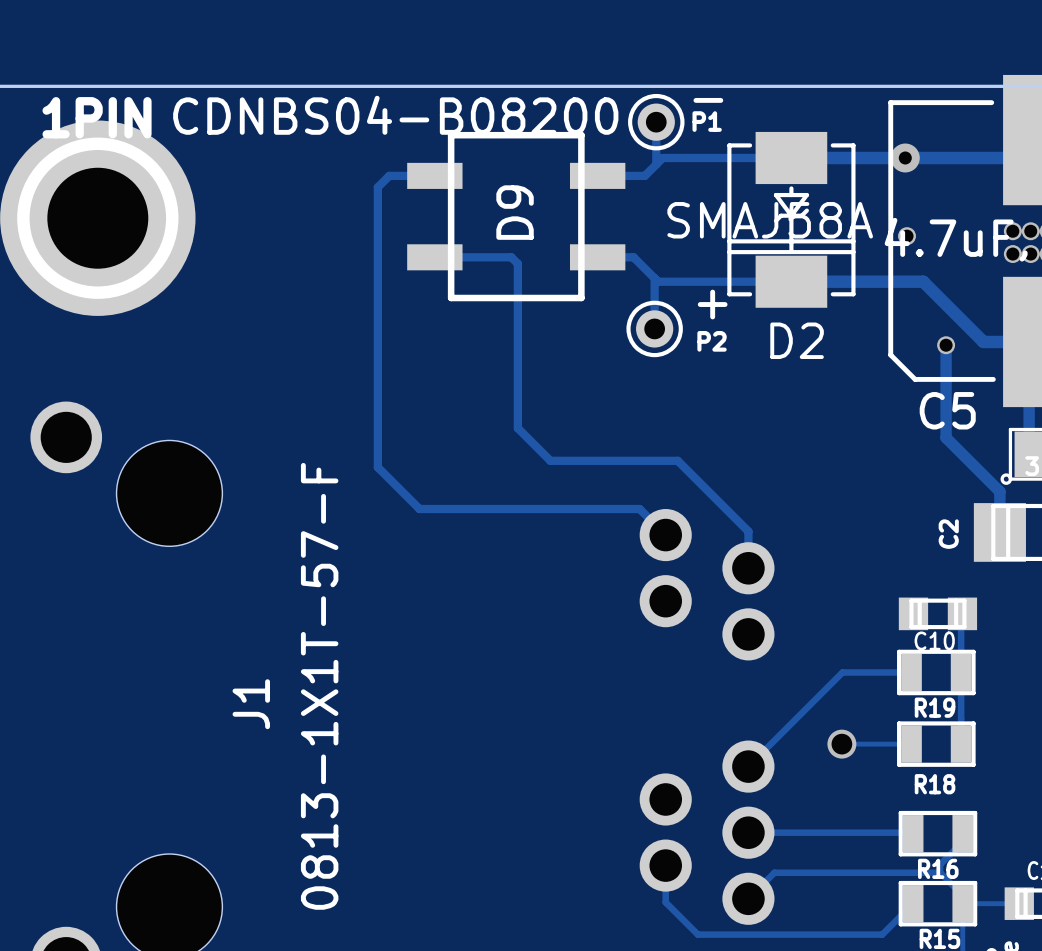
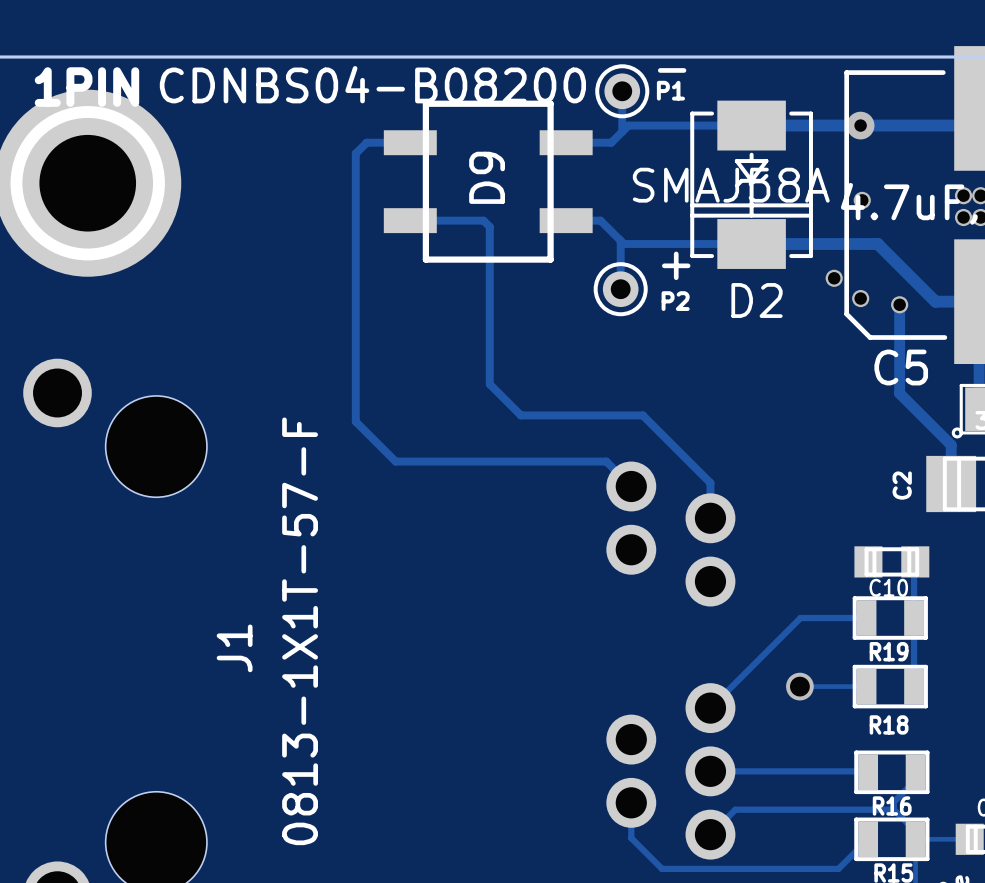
via: none -> (834, 278)
via: none -> (860, 298)

